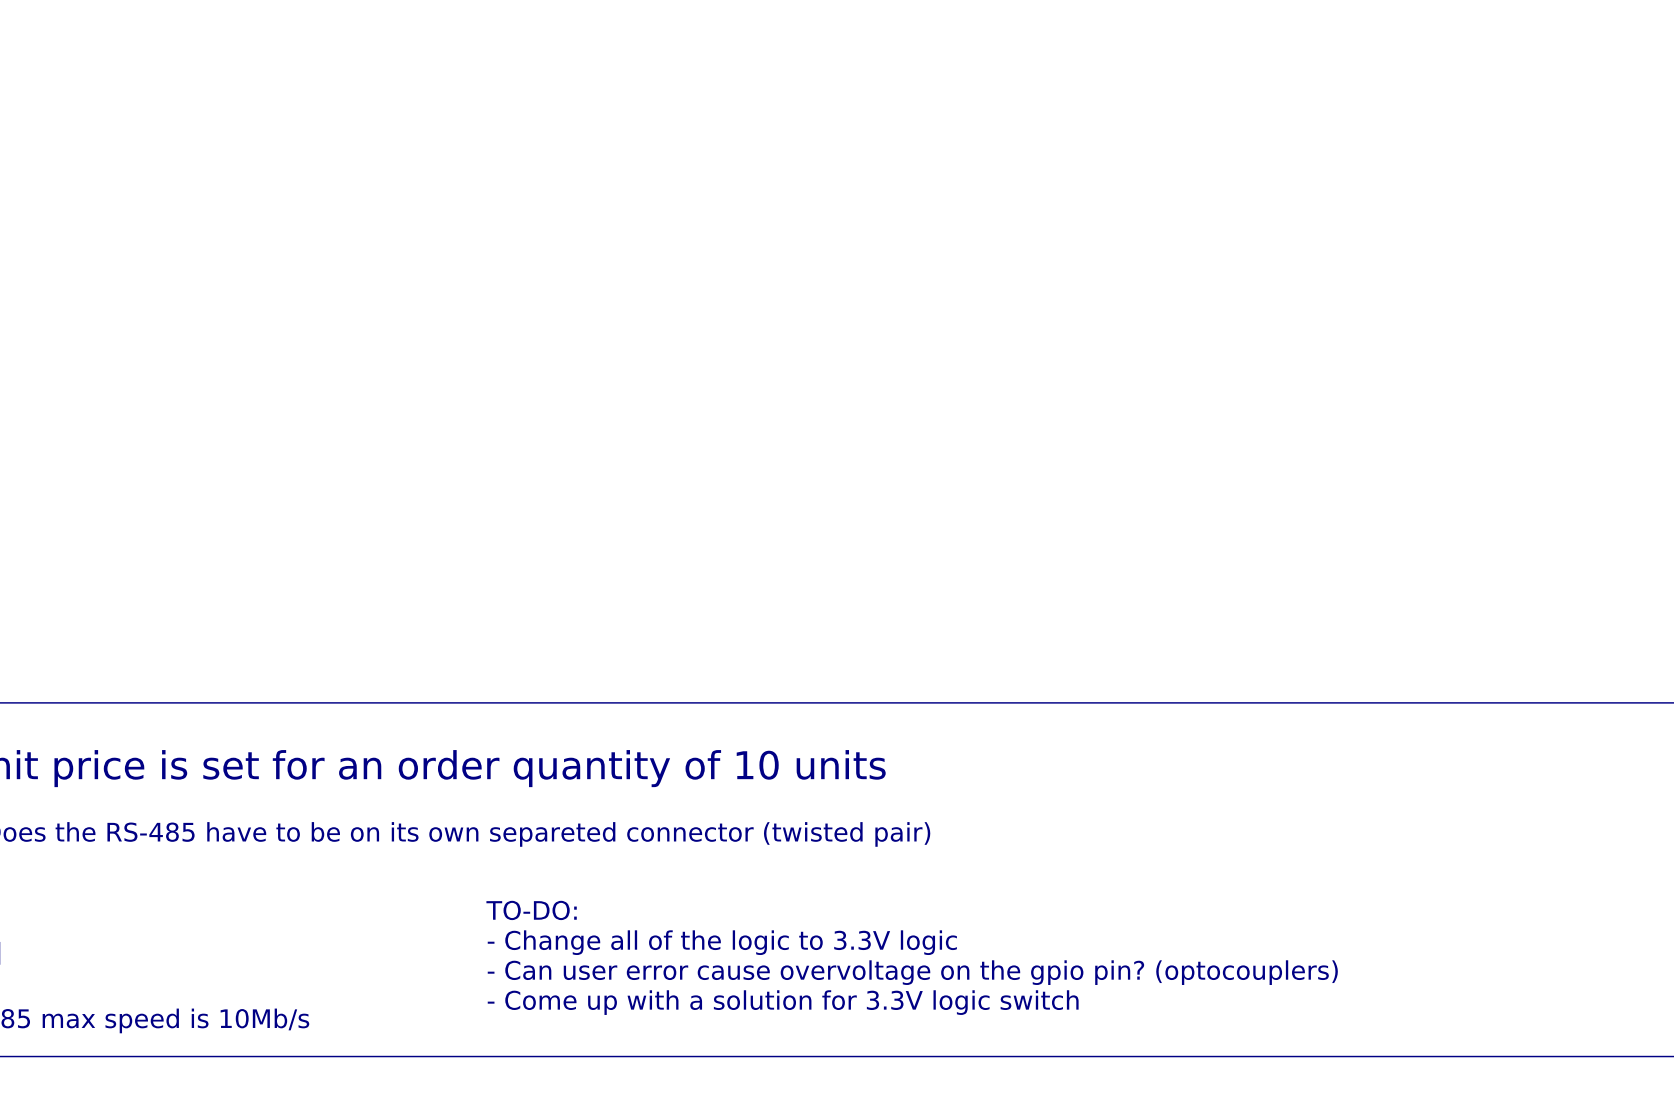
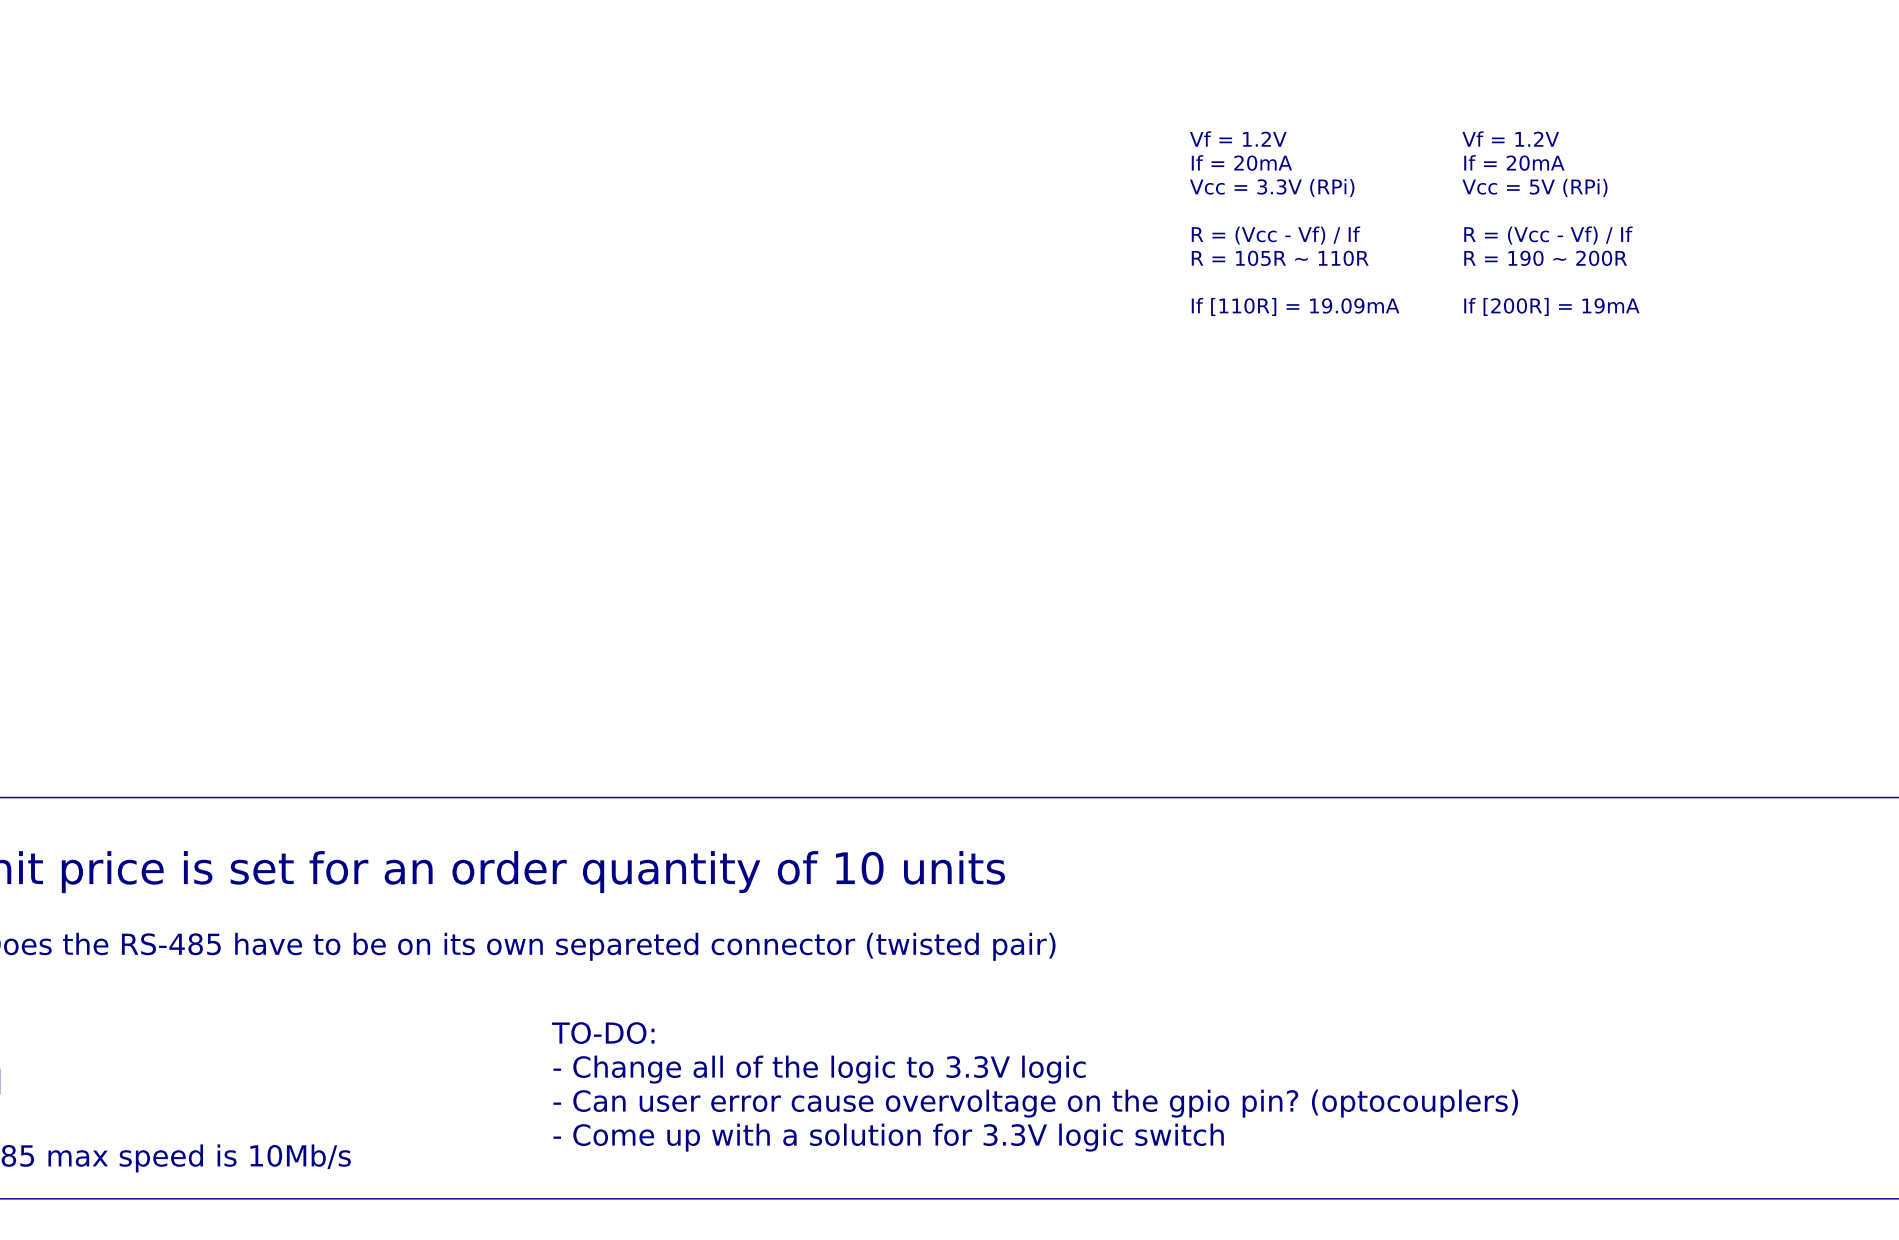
text: none -> Vf = 1.2V (1238, 139)
text: none -> Vf = 1.2V (1510, 139)
text: none -> If = 20mA (1241, 162)
text: none -> If = 20mA (1514, 162)
text: none -> Vcc = 3.3V (RPi) (1272, 187)
text: none -> Vcc = 5V (RPi) (1534, 187)
text: none -> R = (Vcc - Vf) / If (1276, 235)
text: none -> R = (Vcc - Vf) / If (1548, 235)
text: none -> R = 105R ~ 110R (1280, 258)
text: none -> R = 190 ~ 200R (1545, 258)
text: none -> If [110R] = 19.09mA (1295, 306)
text: none -> If [200R] = 19mA (1551, 306)

